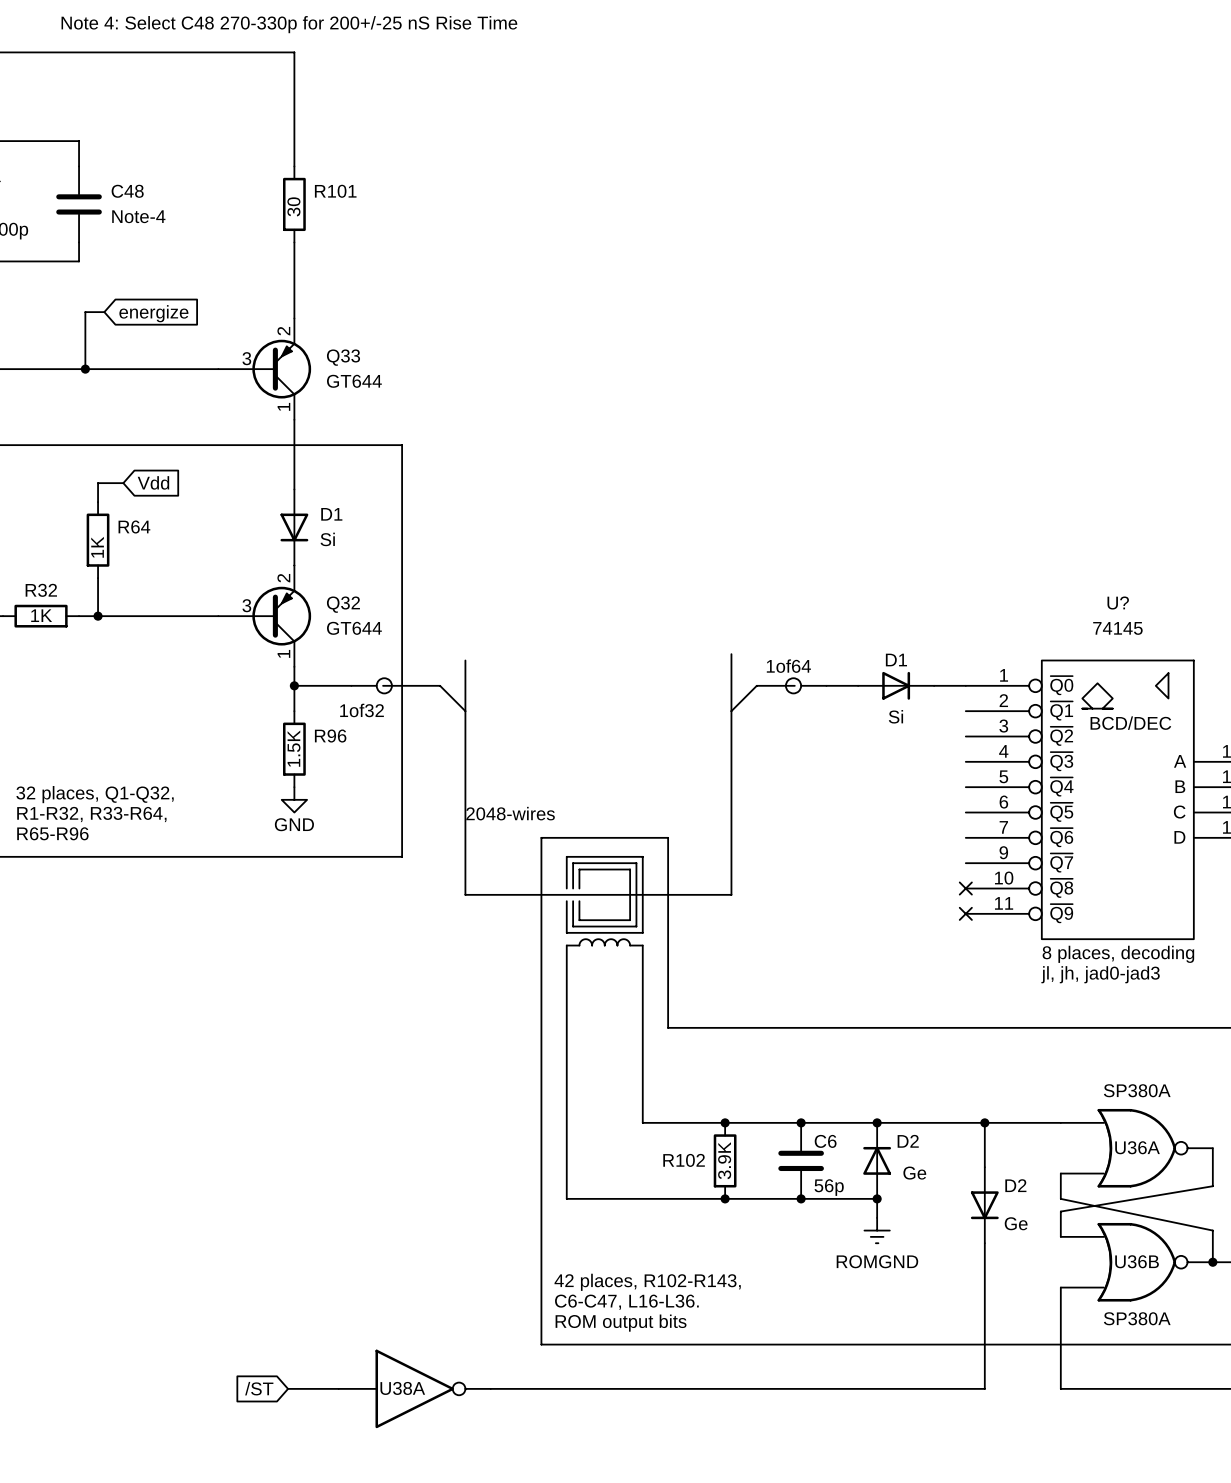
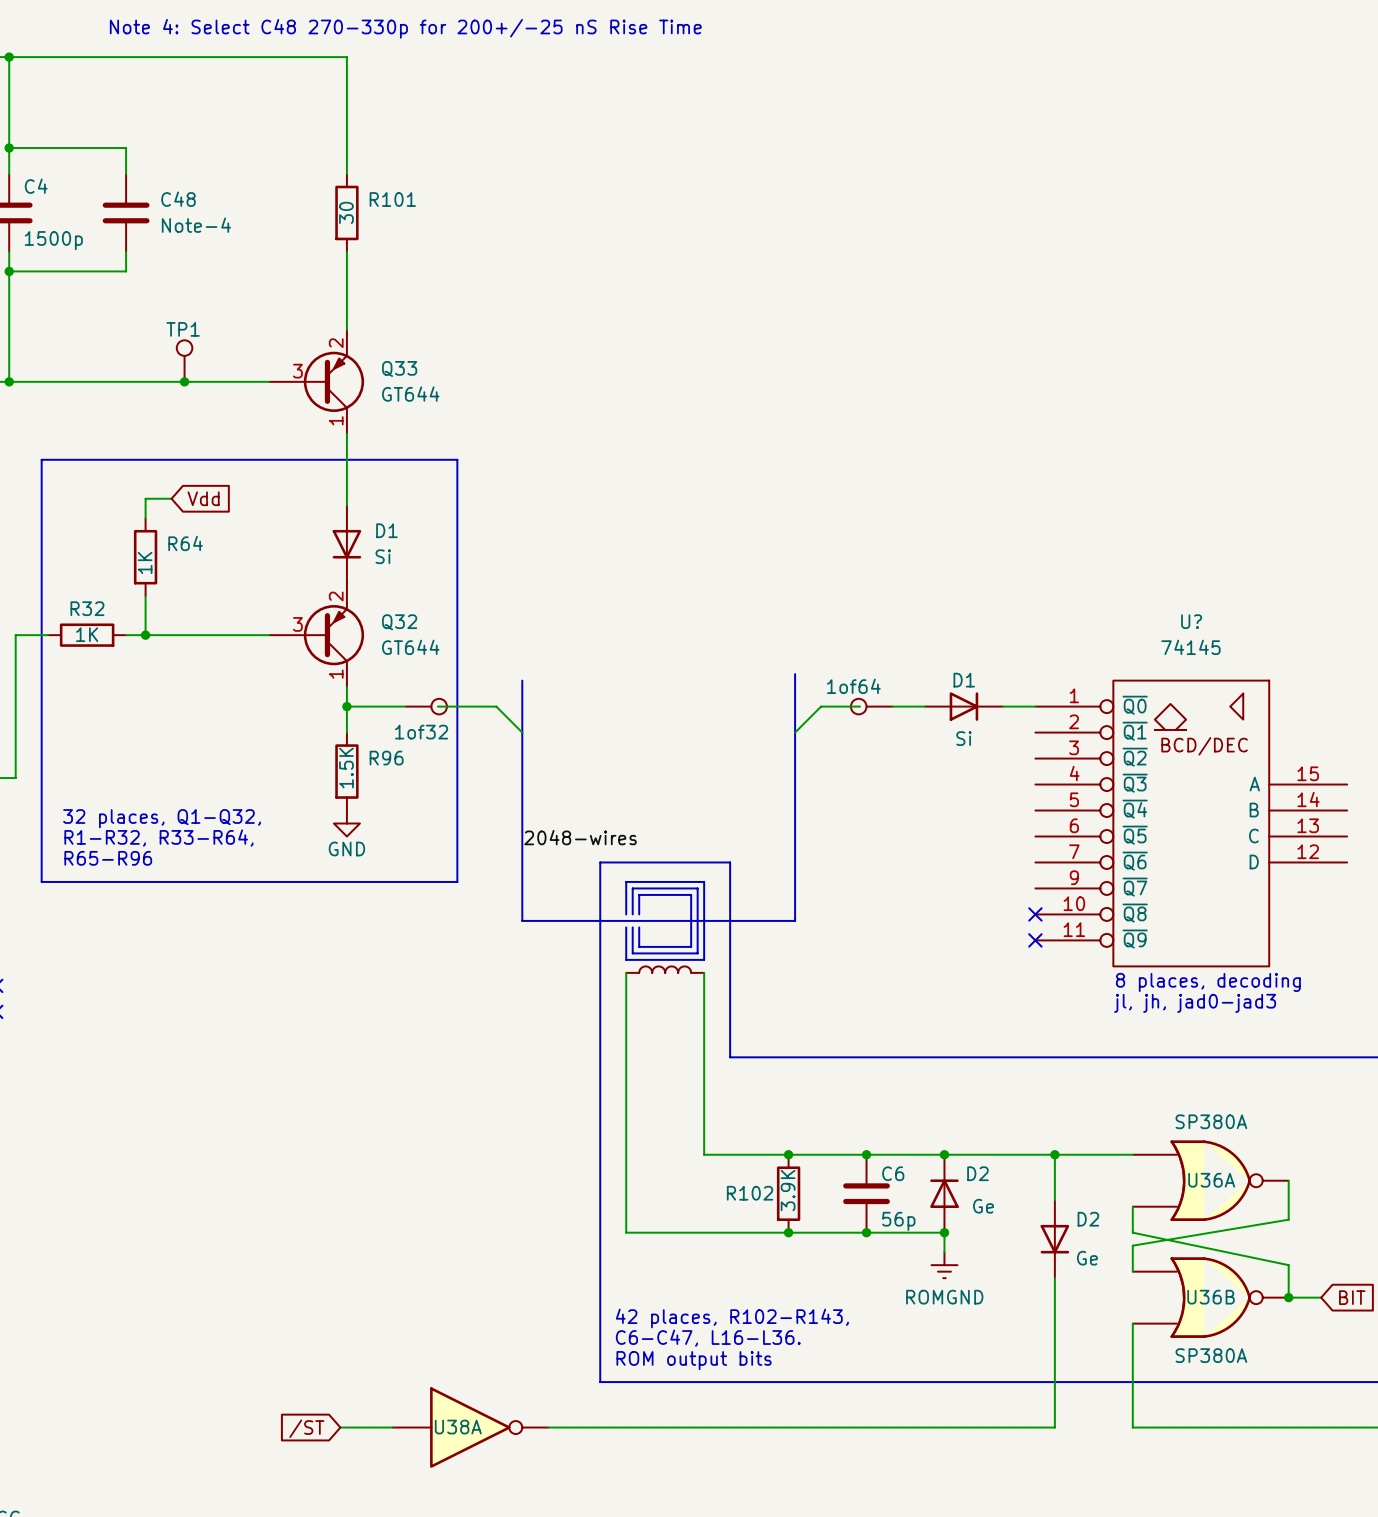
wire: (104, 312) (85, 312) (85, 369) -> none
global label: energize (153, 313) -> none
TP1: none -> (184, 361)
junction position: (85, 369) -> (184, 381)

